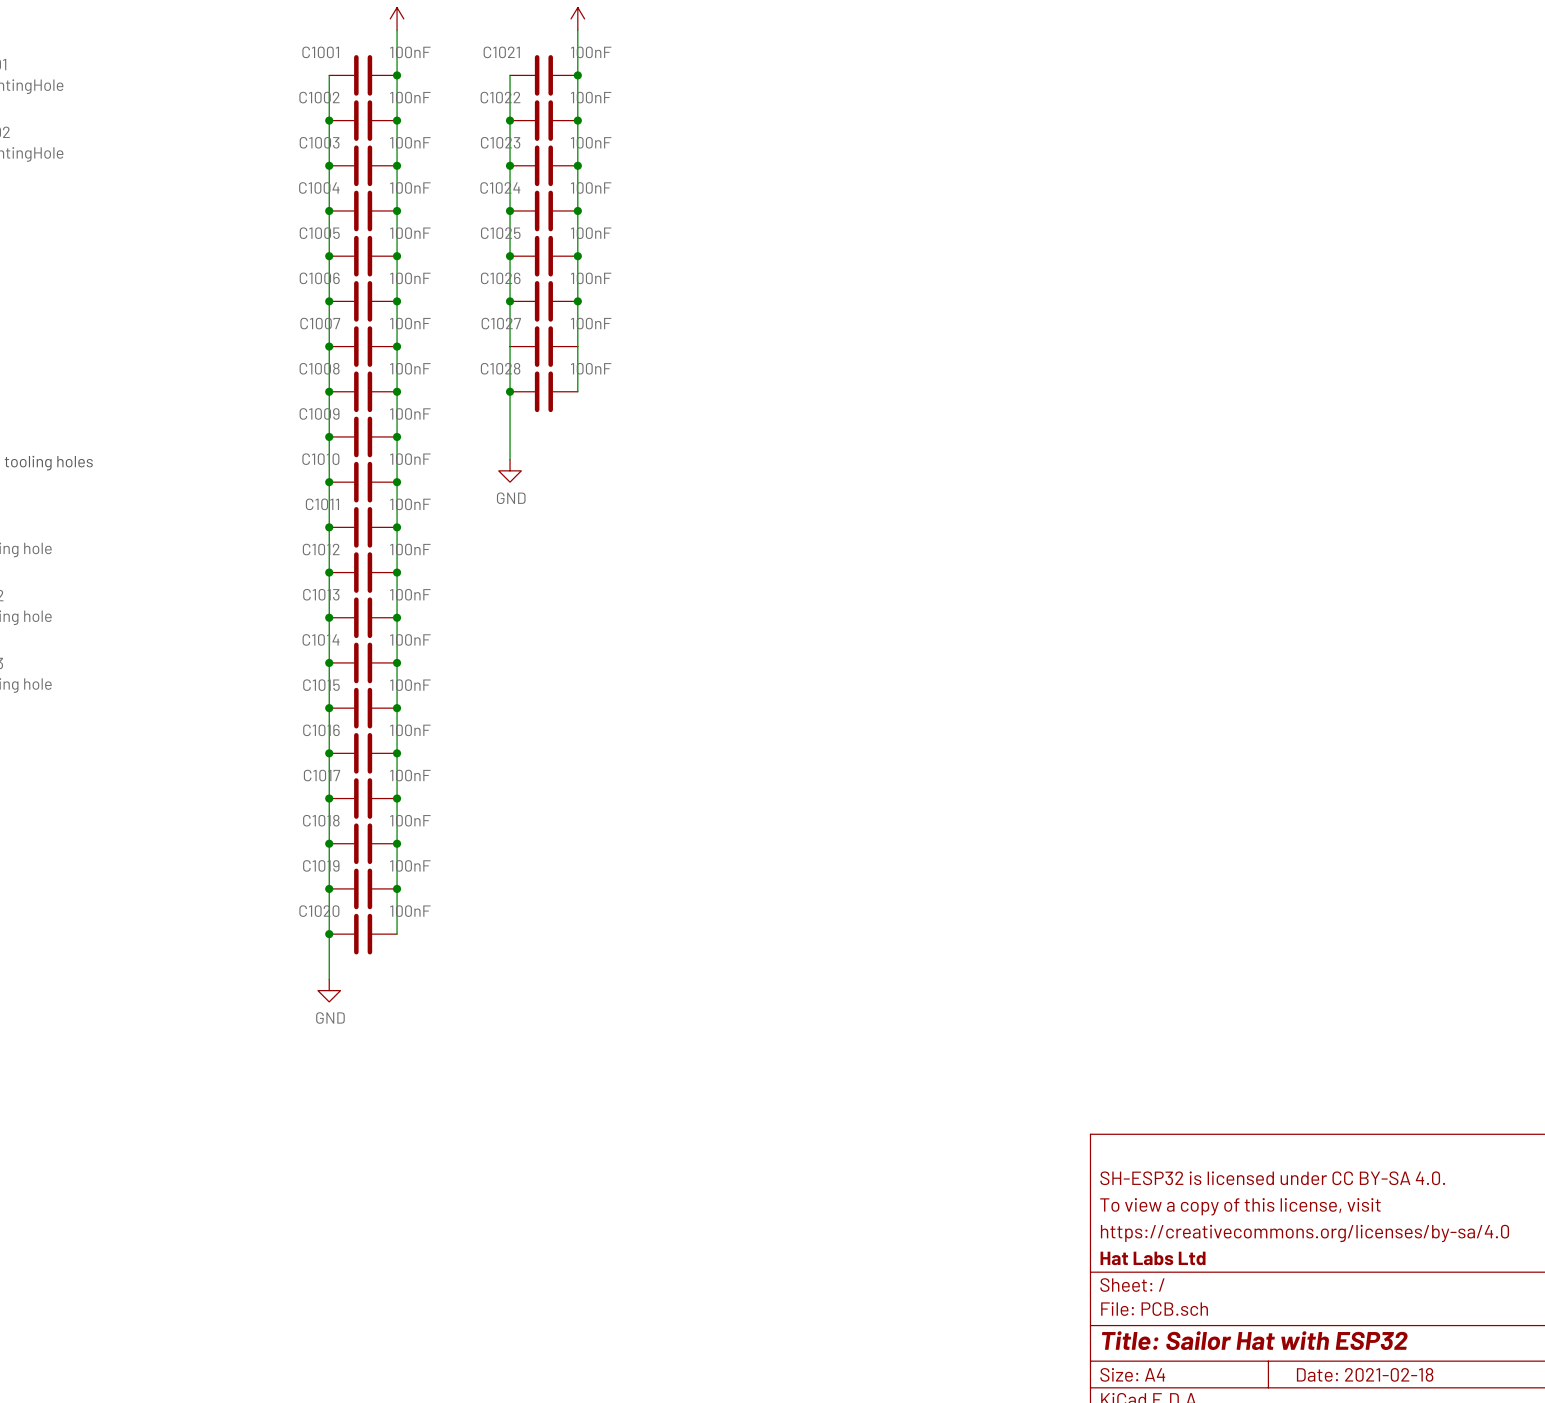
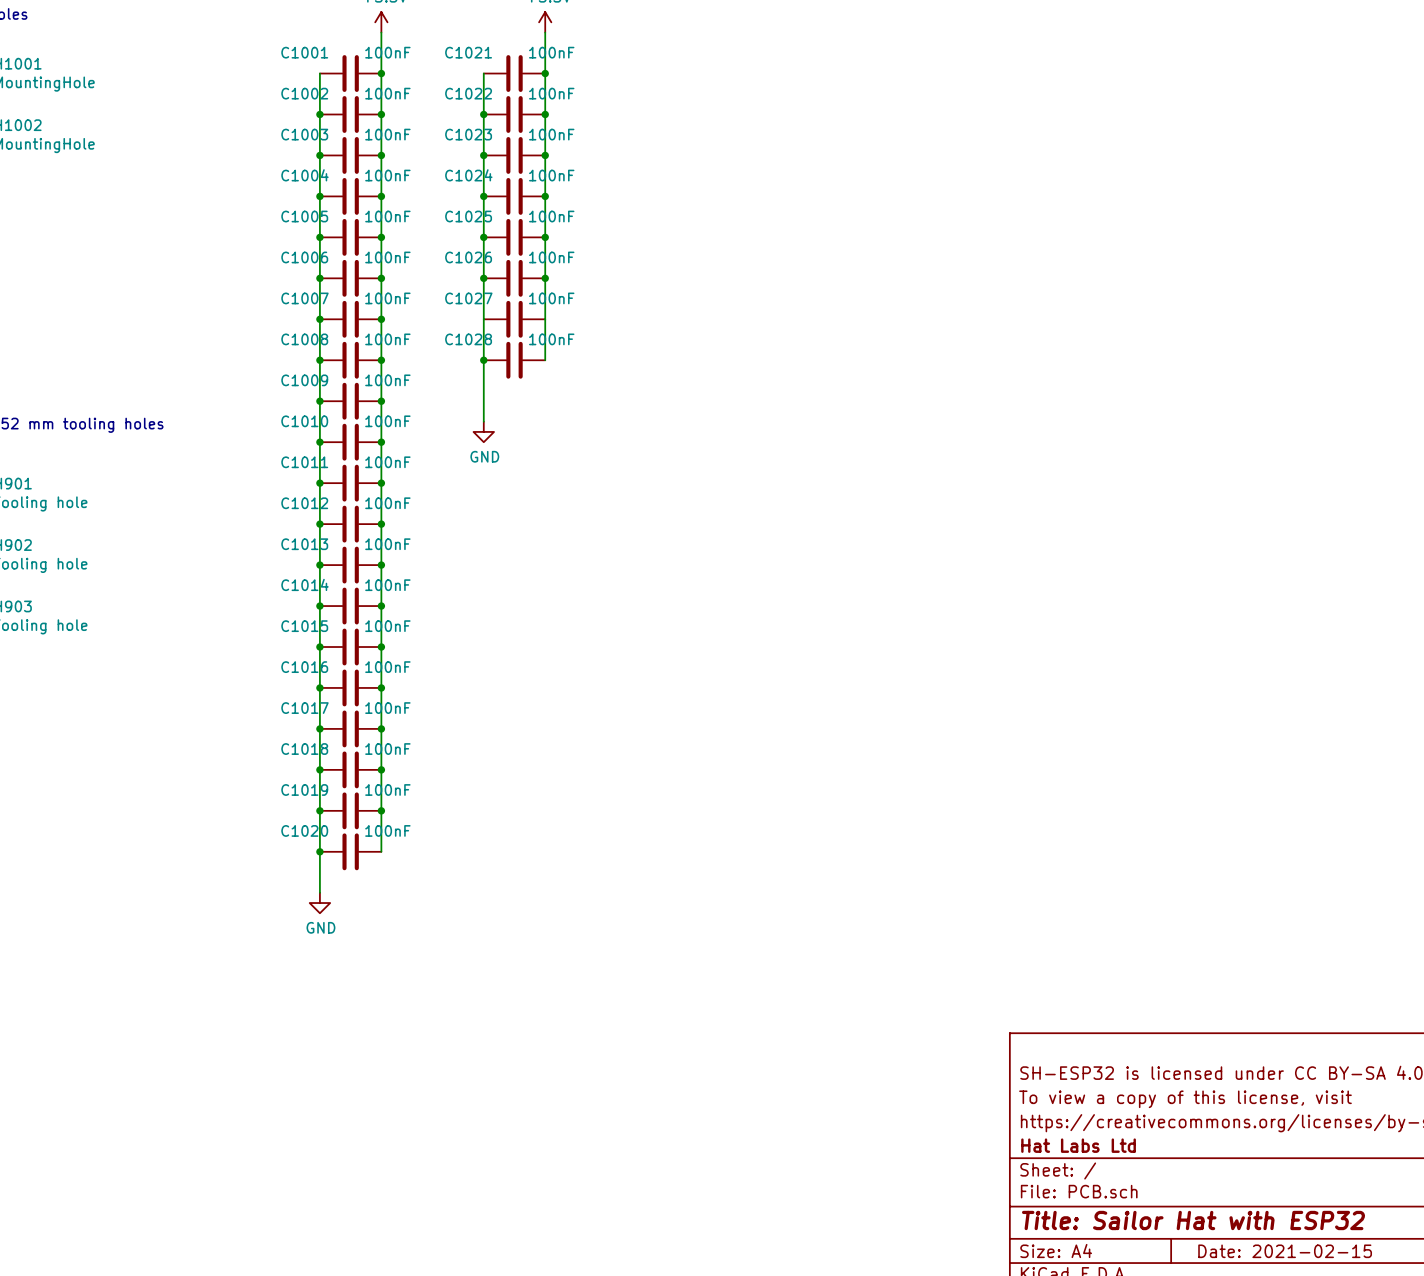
title block: Date: 2021-02-18 (1365, 1374) -> Date: 2021-02-15 (1285, 1251)

